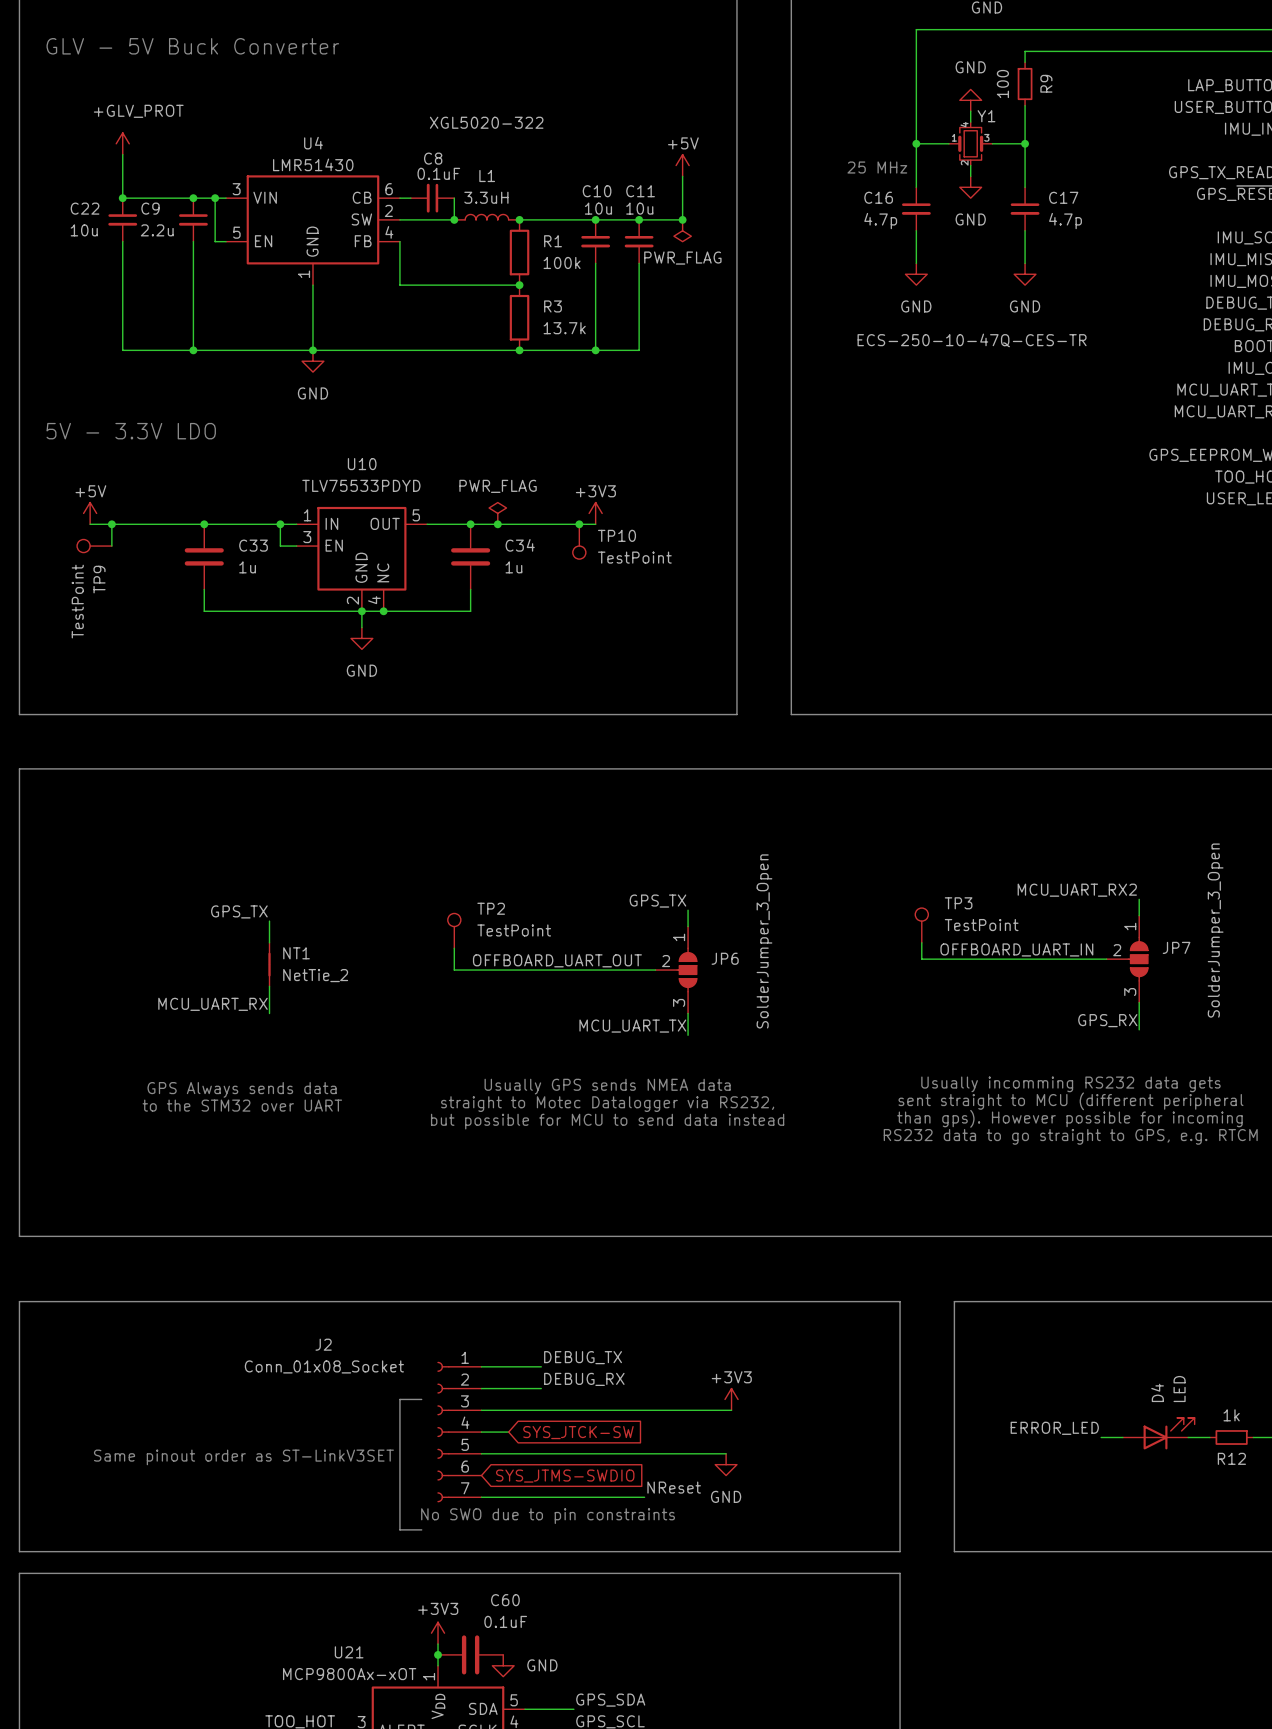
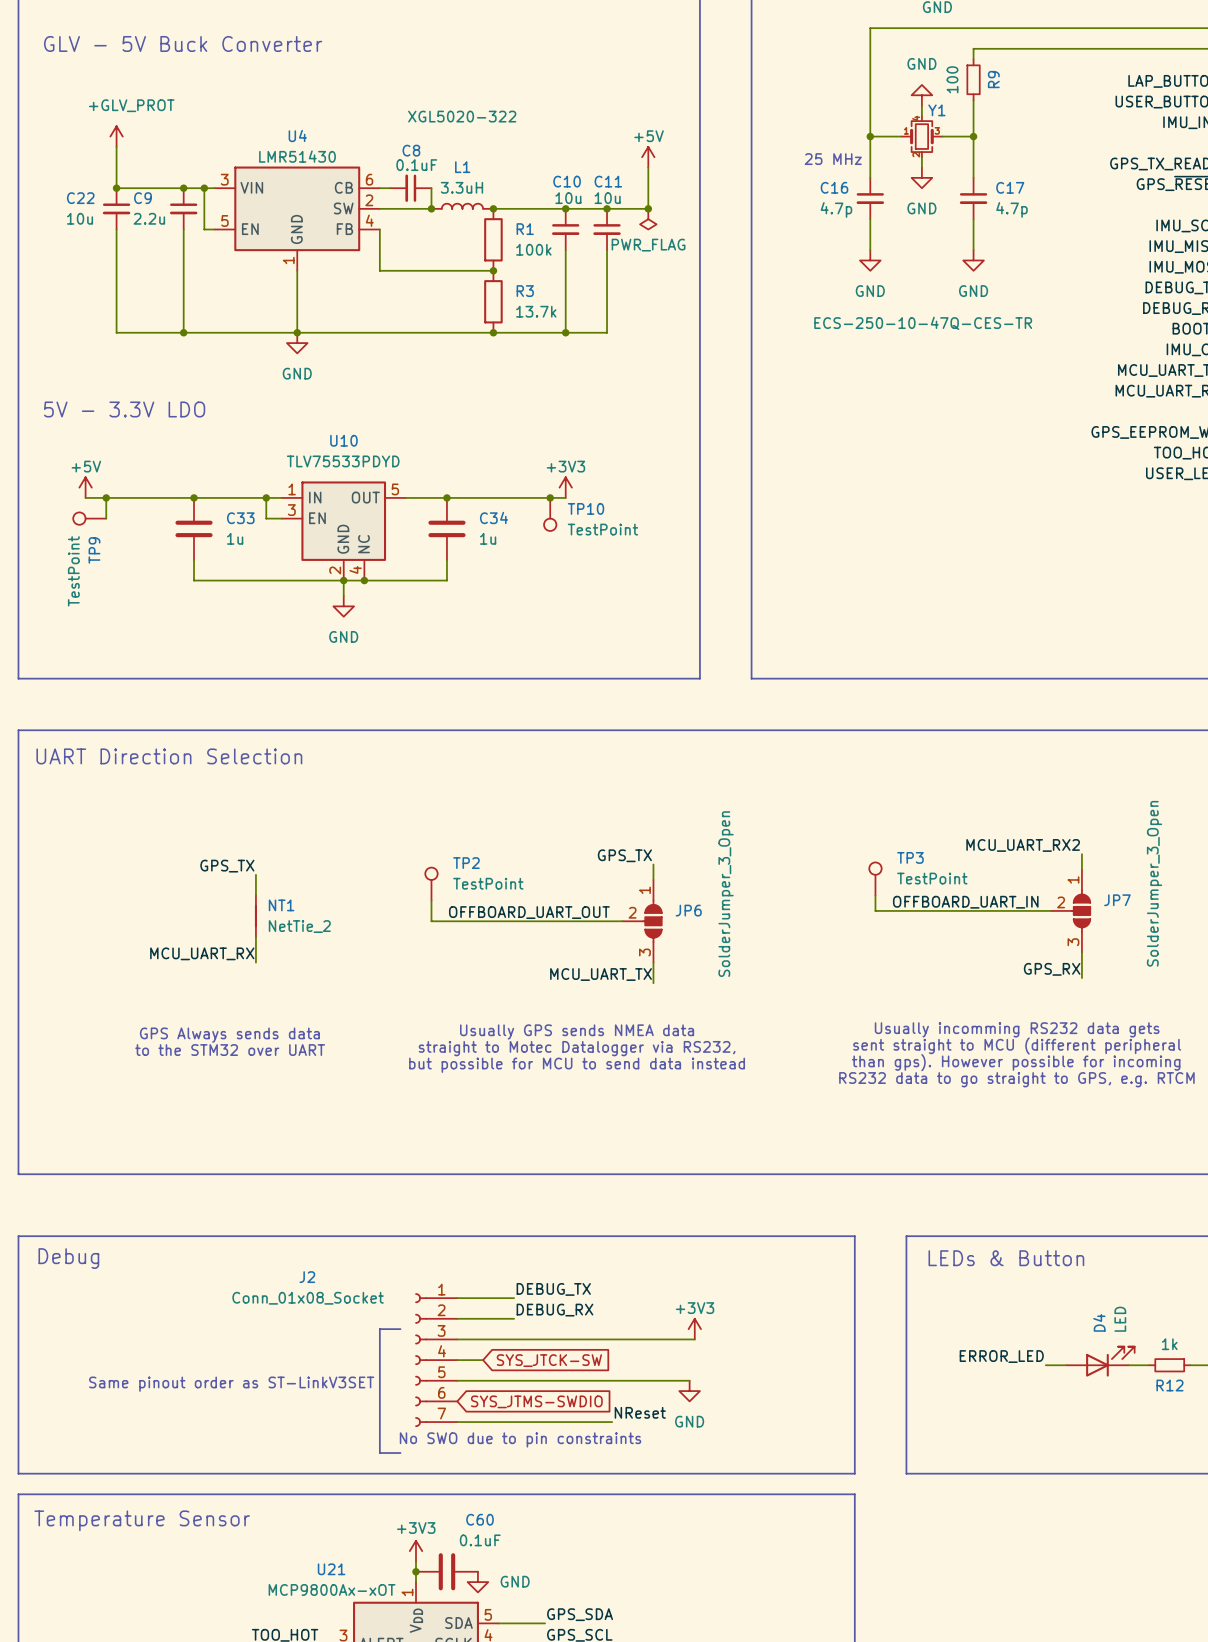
power symbol: PWR_FLAG (497, 513) -> none
junction: (497, 524) -> none
text: none -> UART Direction Selection (169, 756)
text: none -> LEDs & Button (1006, 1258)
text: none -> Debug (68, 1258)
text: none -> Temperature Sensor (142, 1520)

